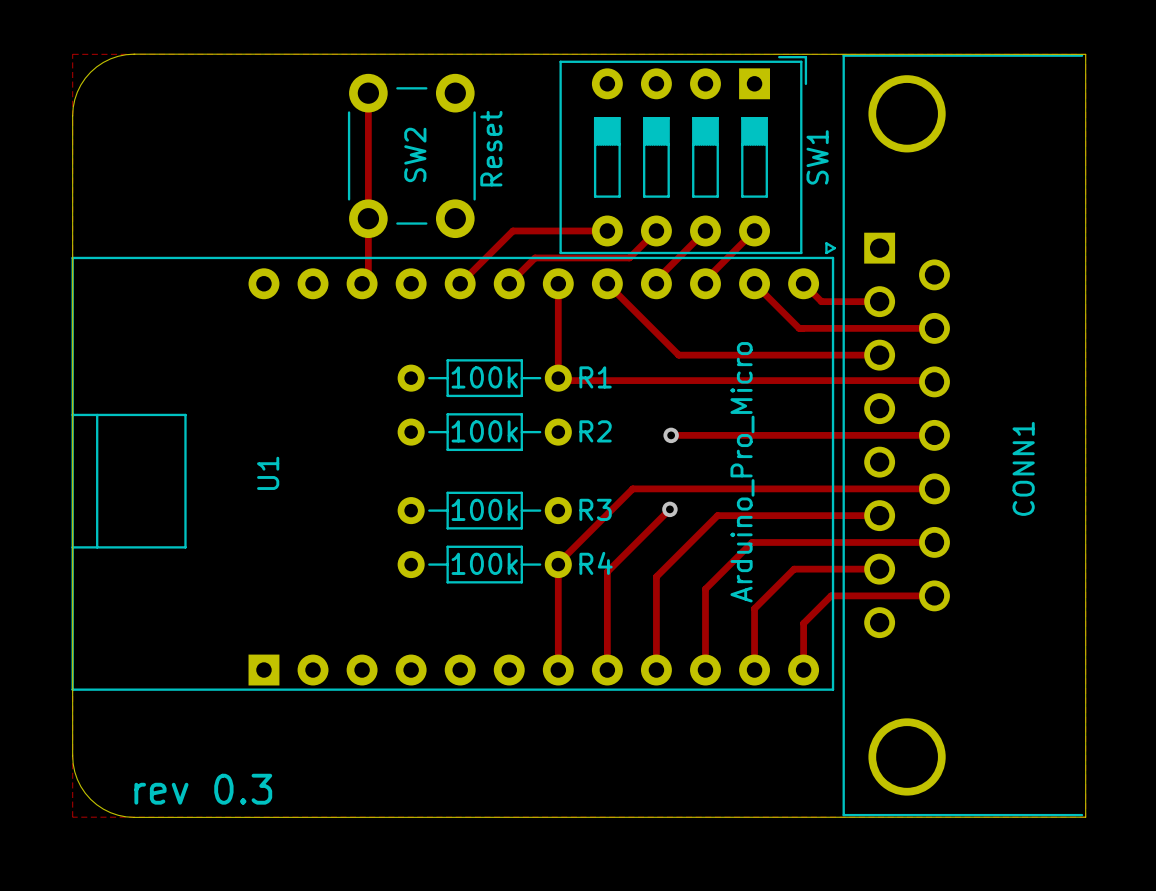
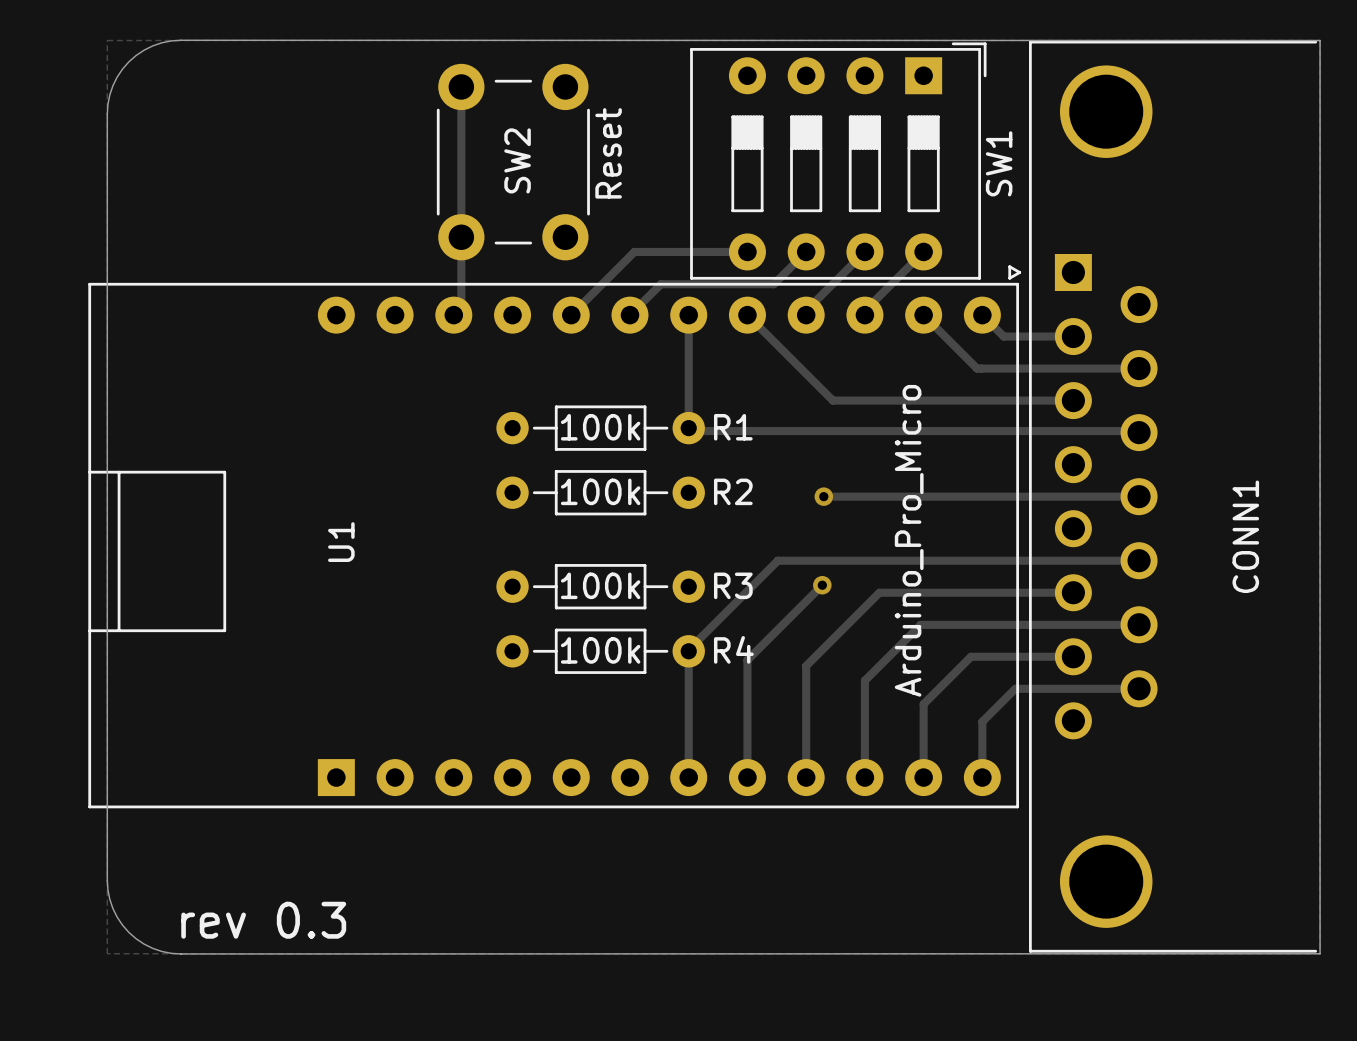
U1 footprint: [71, 256, 835, 691] -> [88, 282, 1019, 809]

